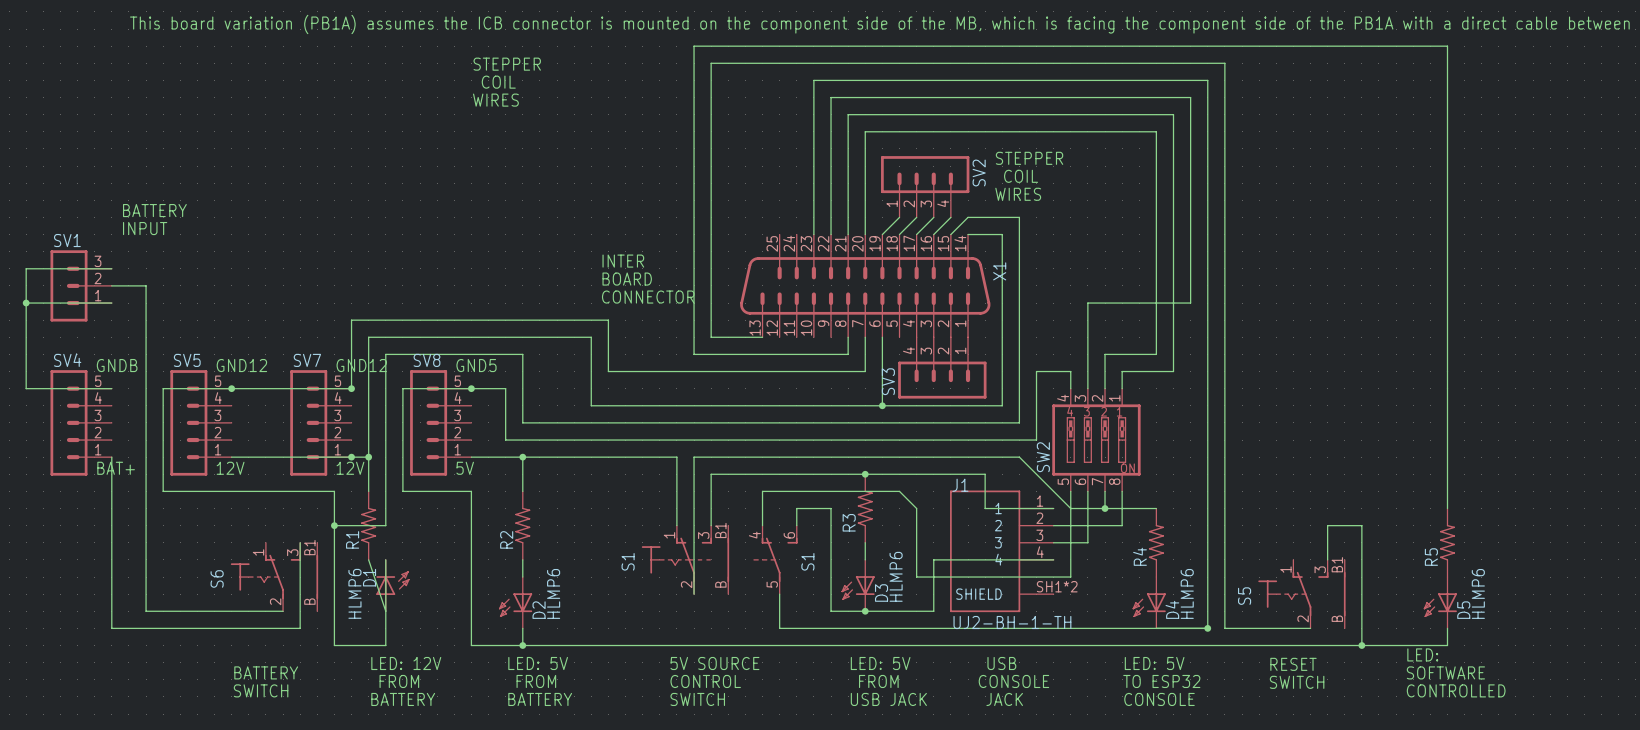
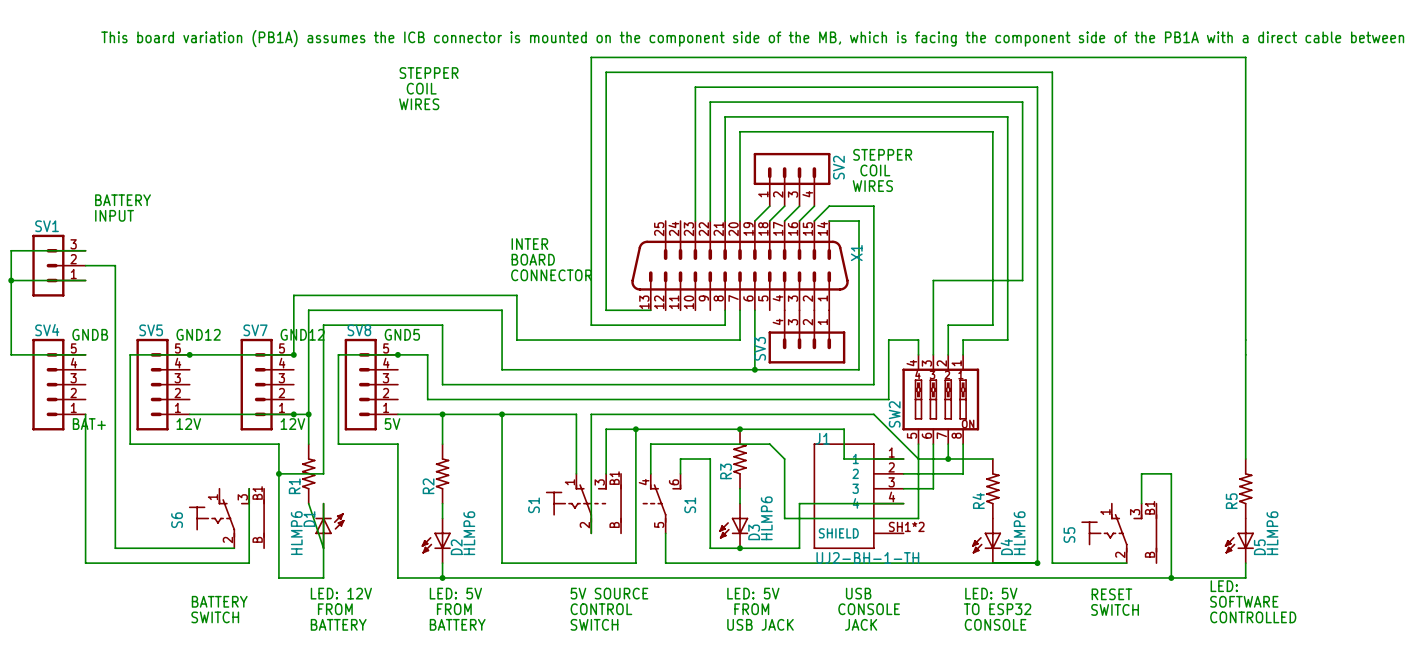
wire: none -> (502, 414) (502, 563) (635, 563) (635, 429)
junction: none -> (502, 414)
junction: none -> (635, 429)

